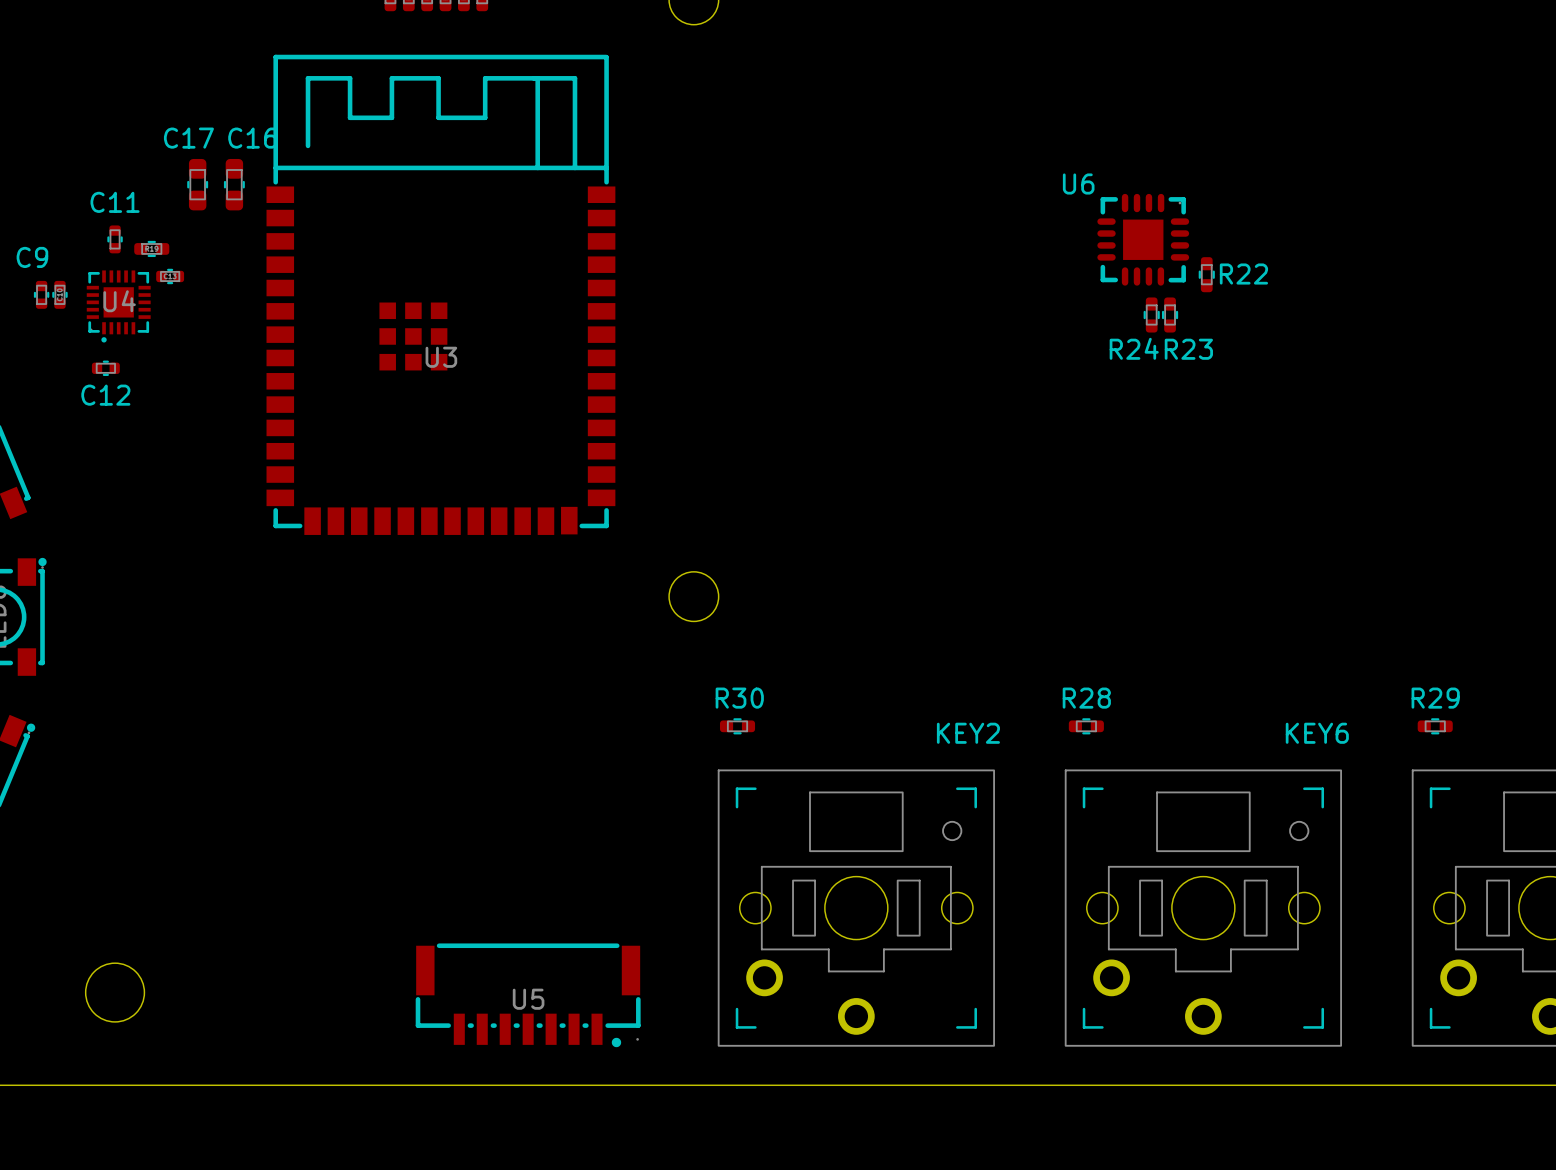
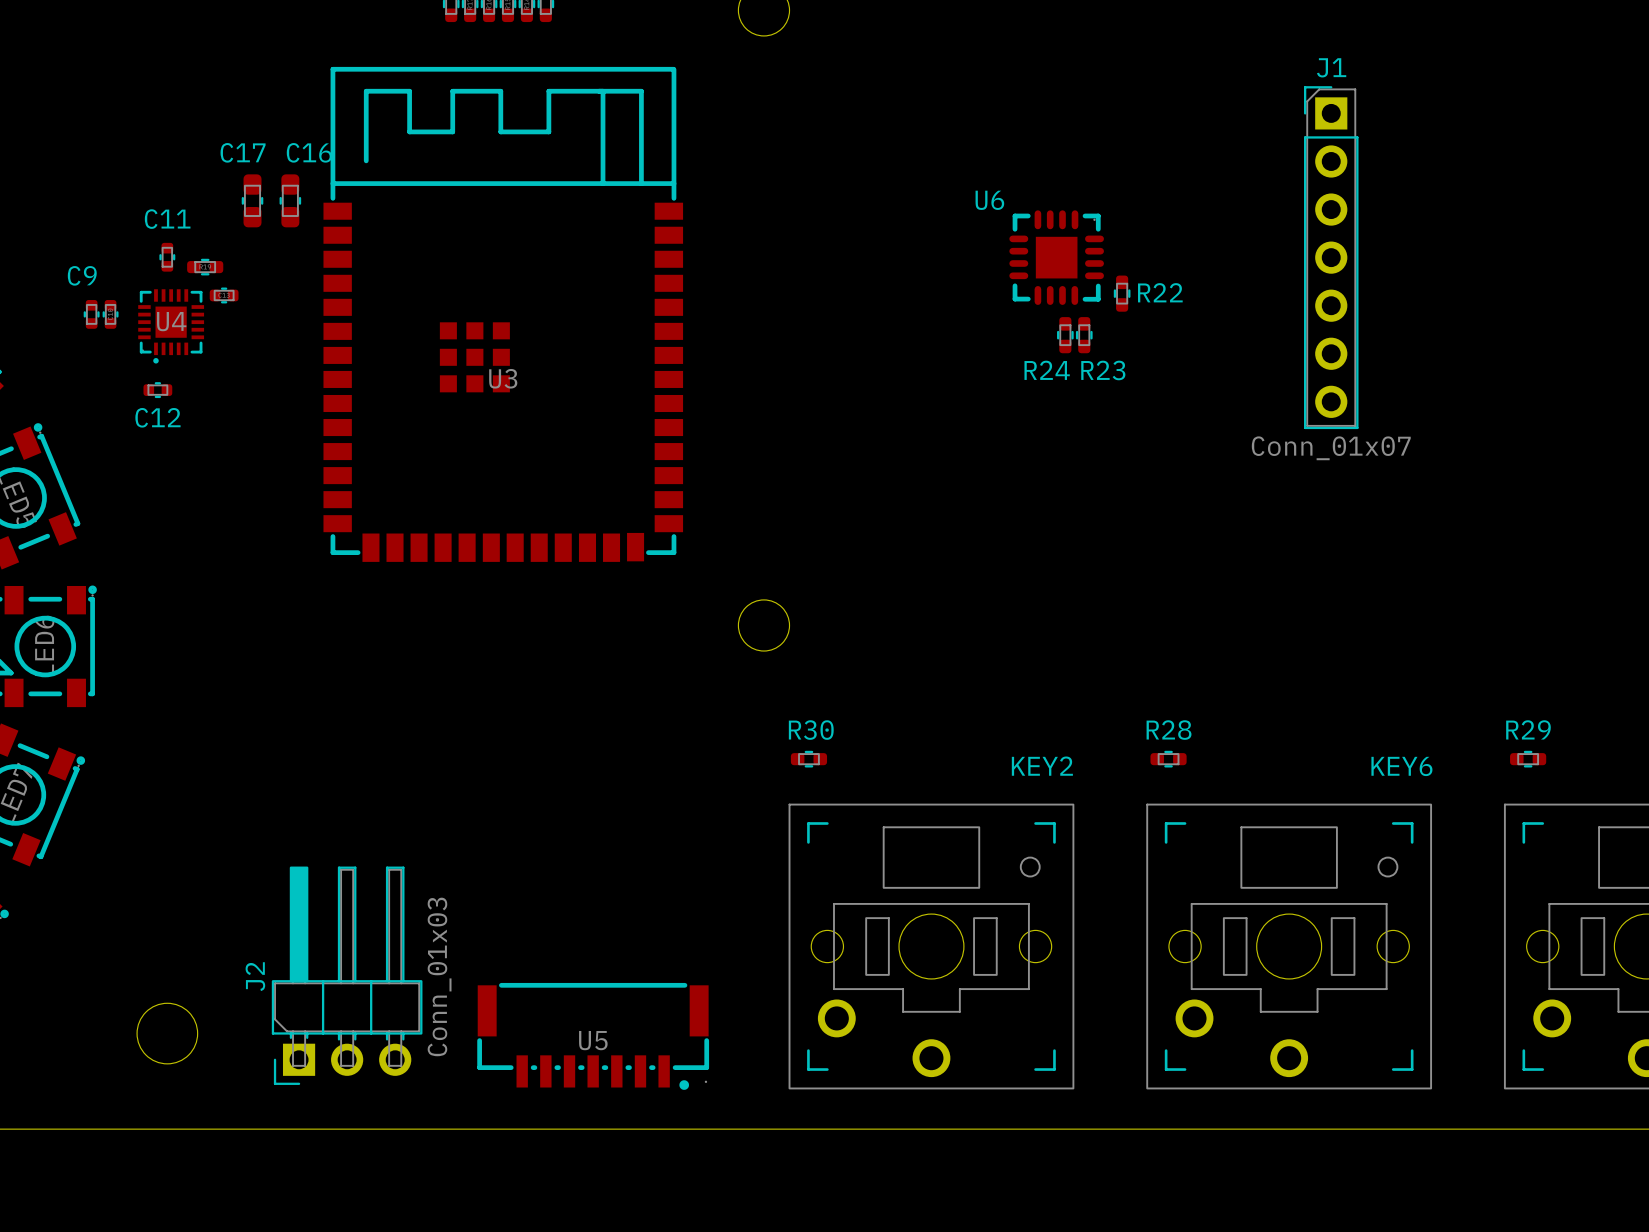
U6 position: (1143, 238) -> (1056, 256)
J1: none -> Conn_01x07 (1331, 257)
R22 position: (1206, 274) -> (1122, 293)
R24 position: (1151, 315) -> (1065, 335)
R23 position: (1170, 315) -> (1084, 335)
J2: none -> Conn_01x03 (347, 975)

